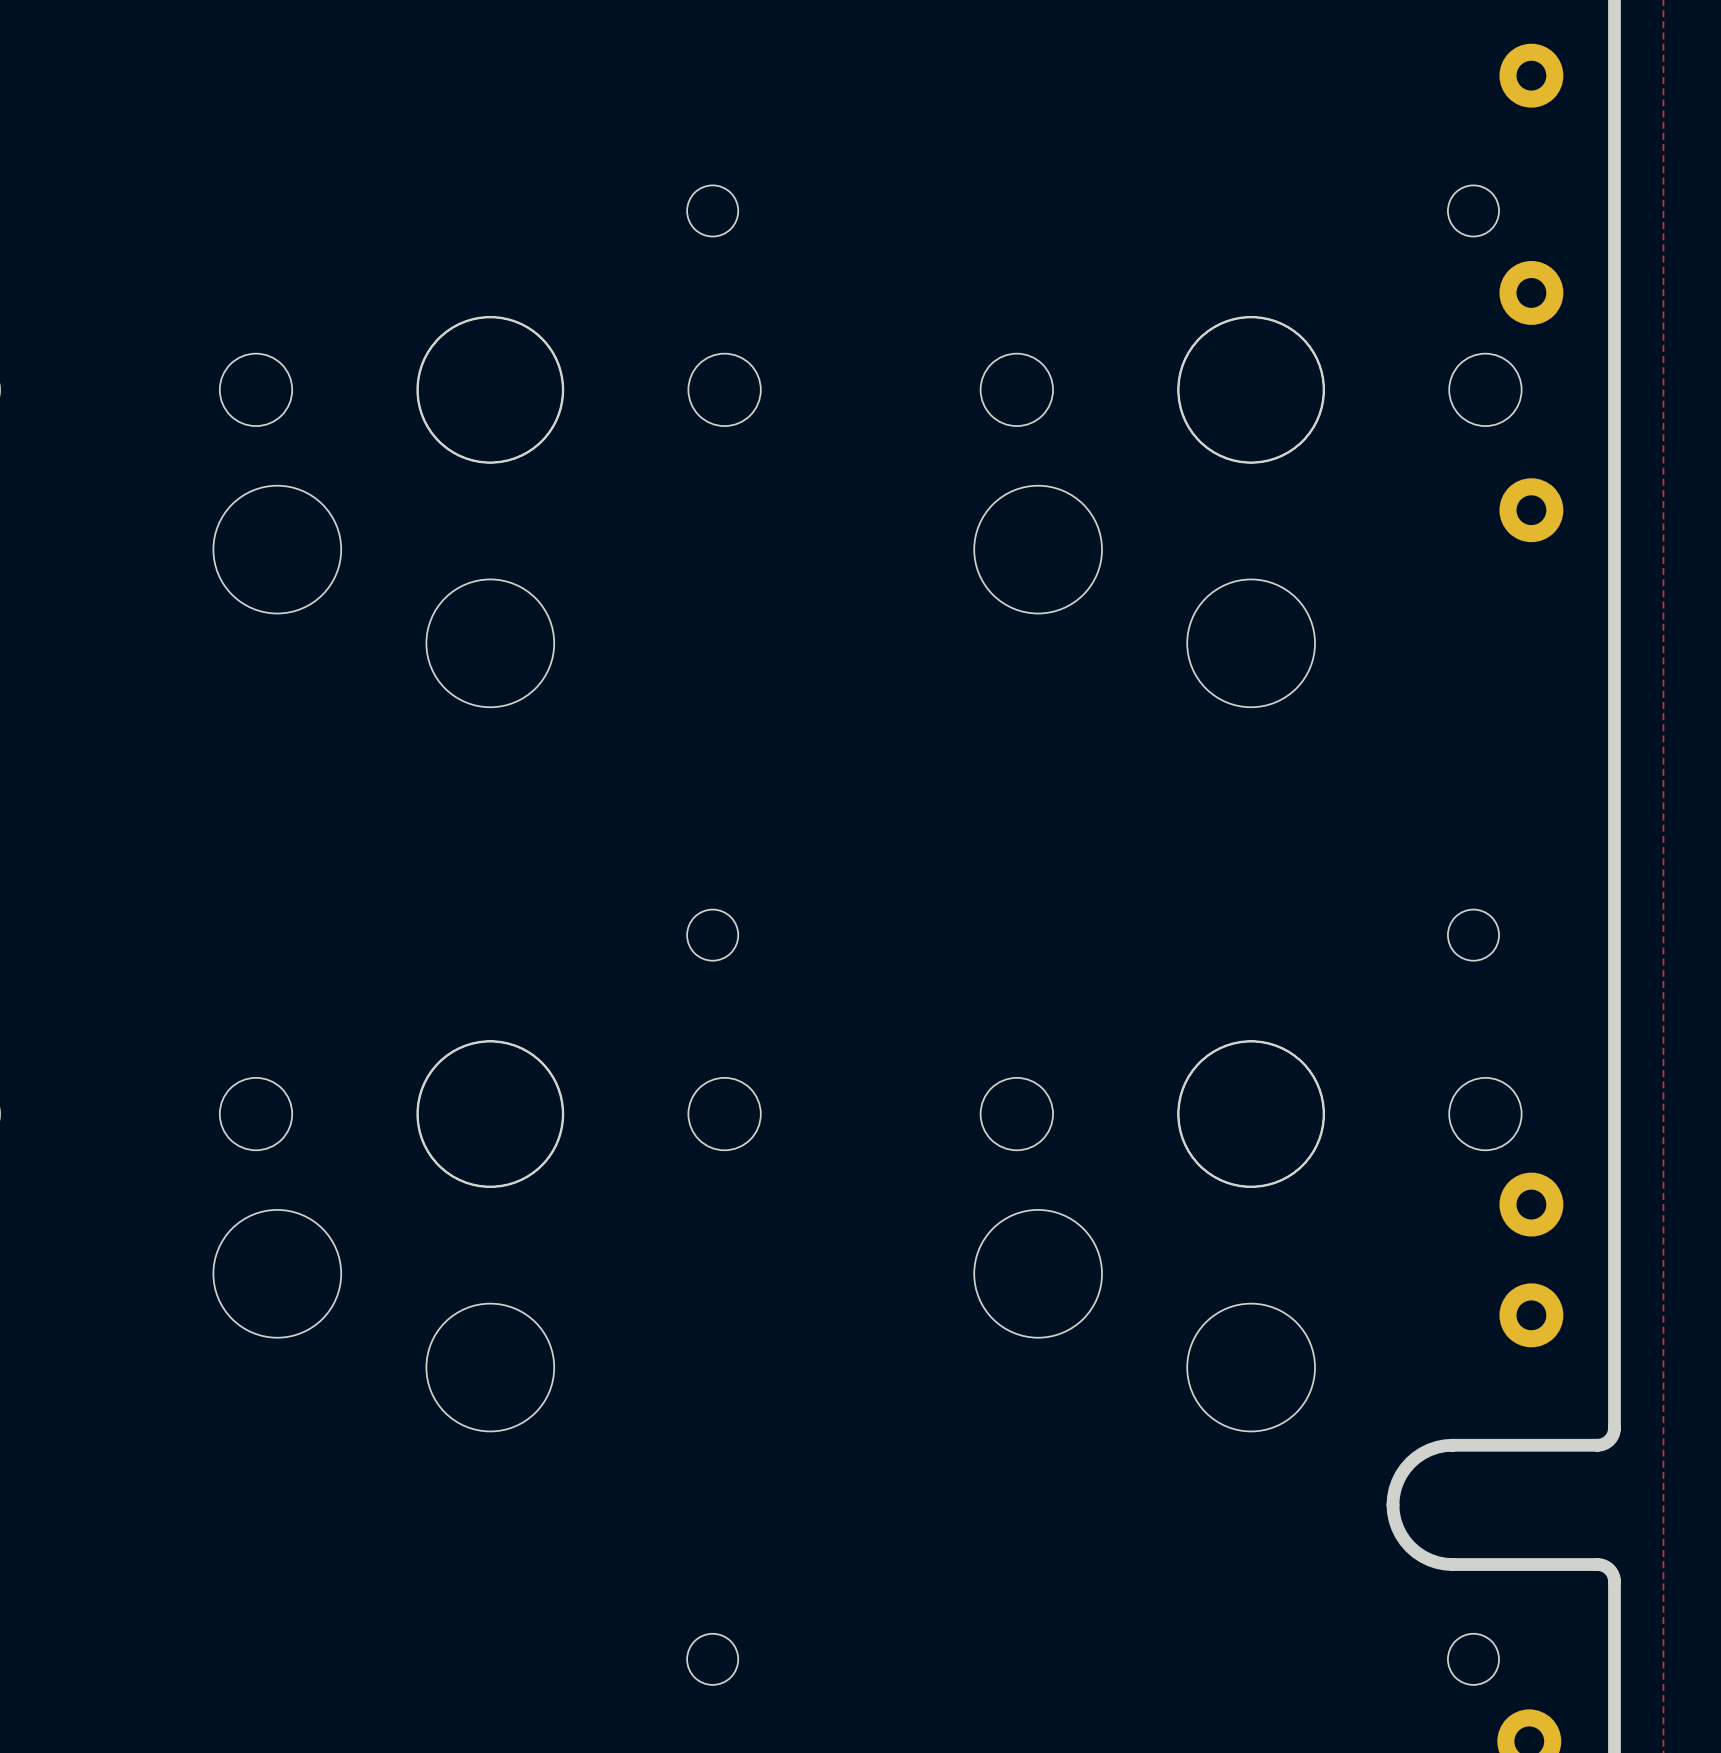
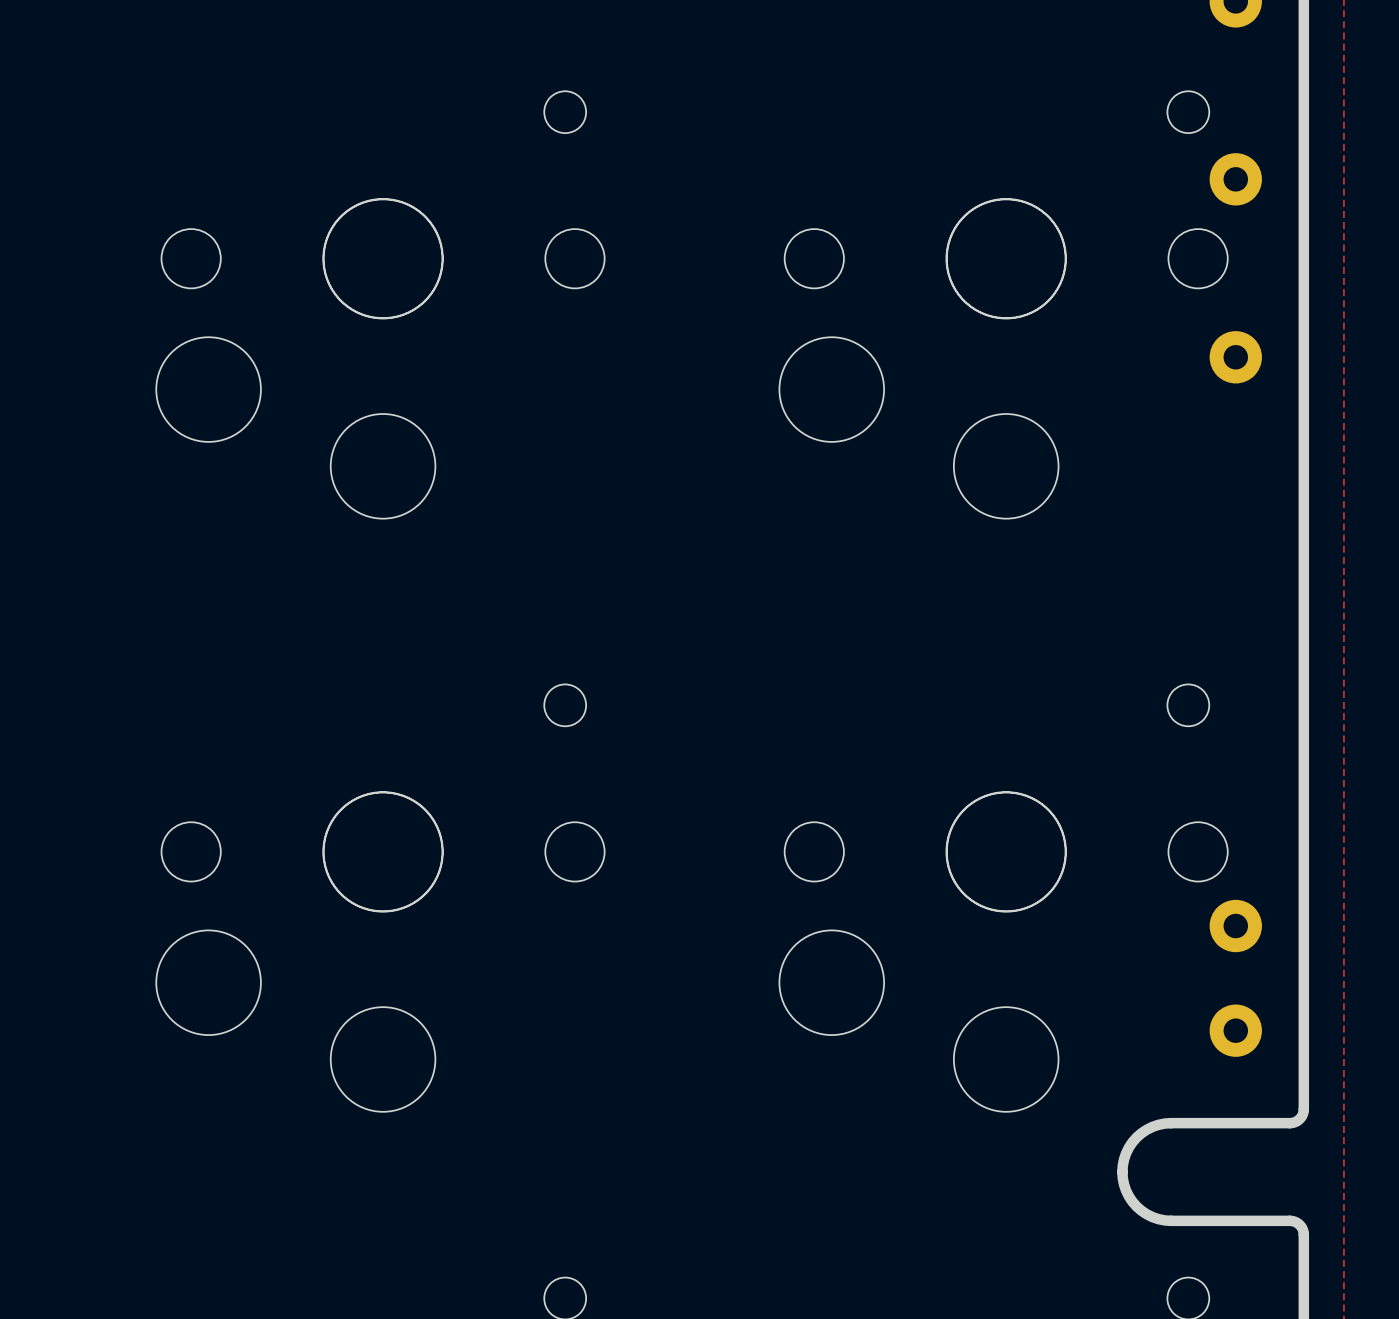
part position: (1531, 1315) -> (1235, 1030)

